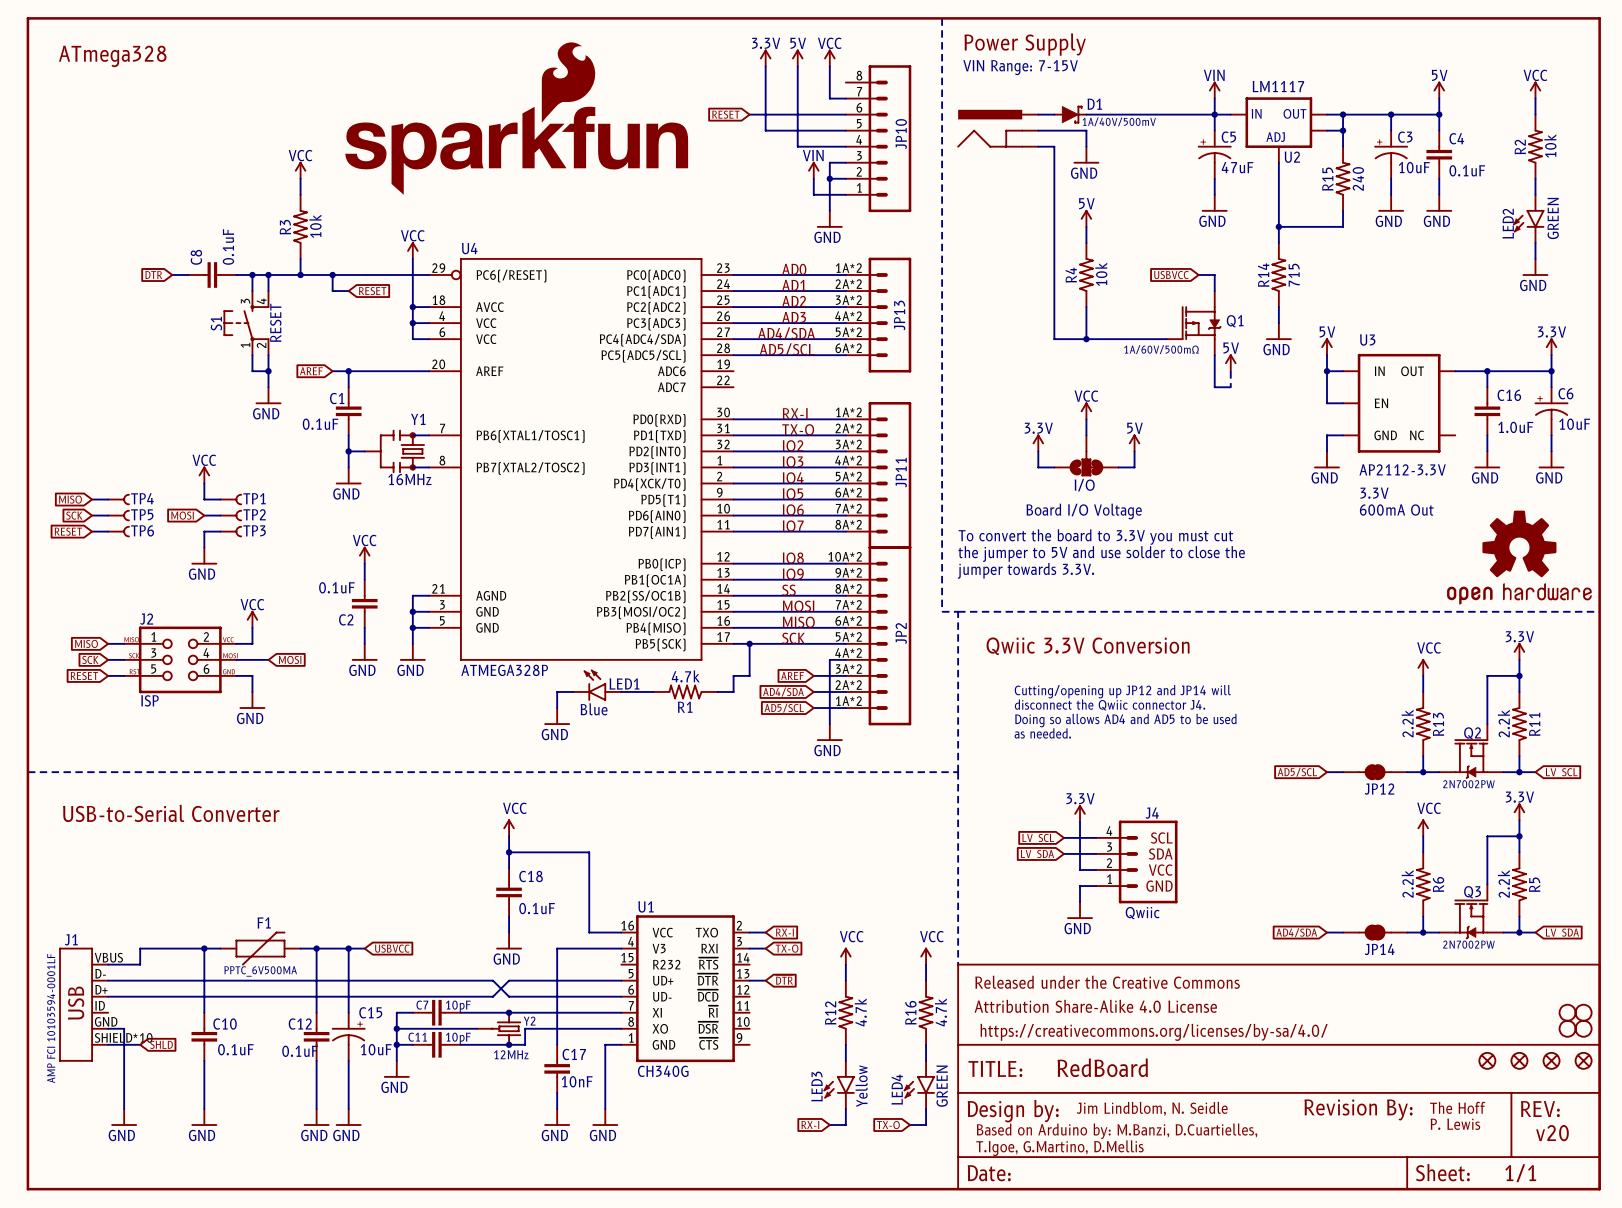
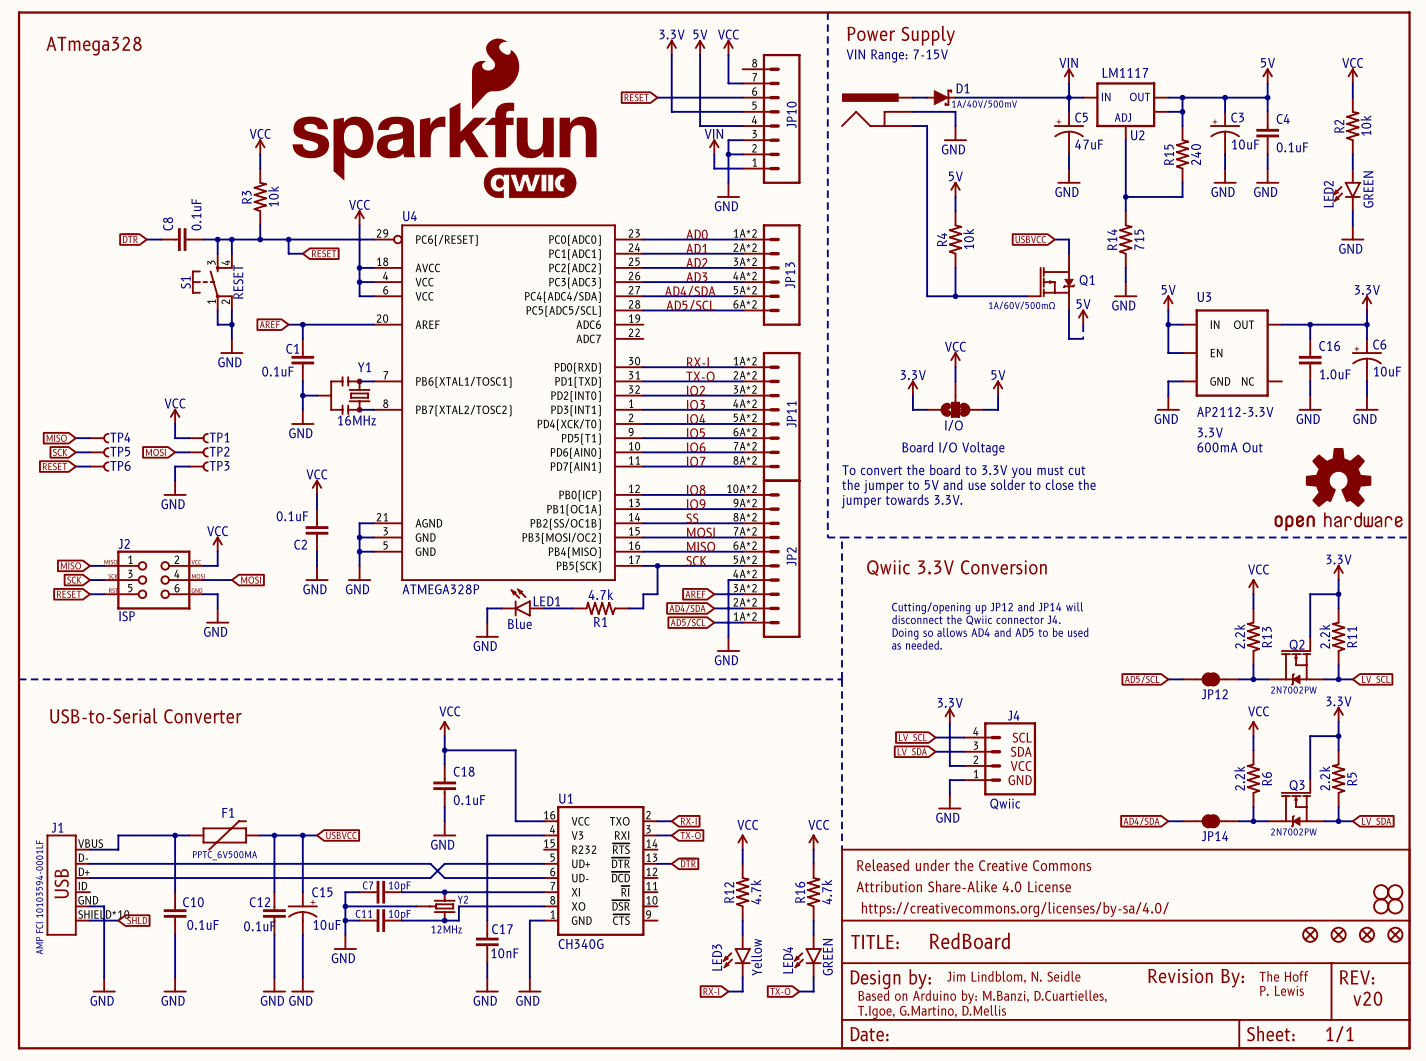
part: (568, 82) -> none
part: none -> (444, 109)
part: (516, 150) -> none
part: none -> (530, 182)

